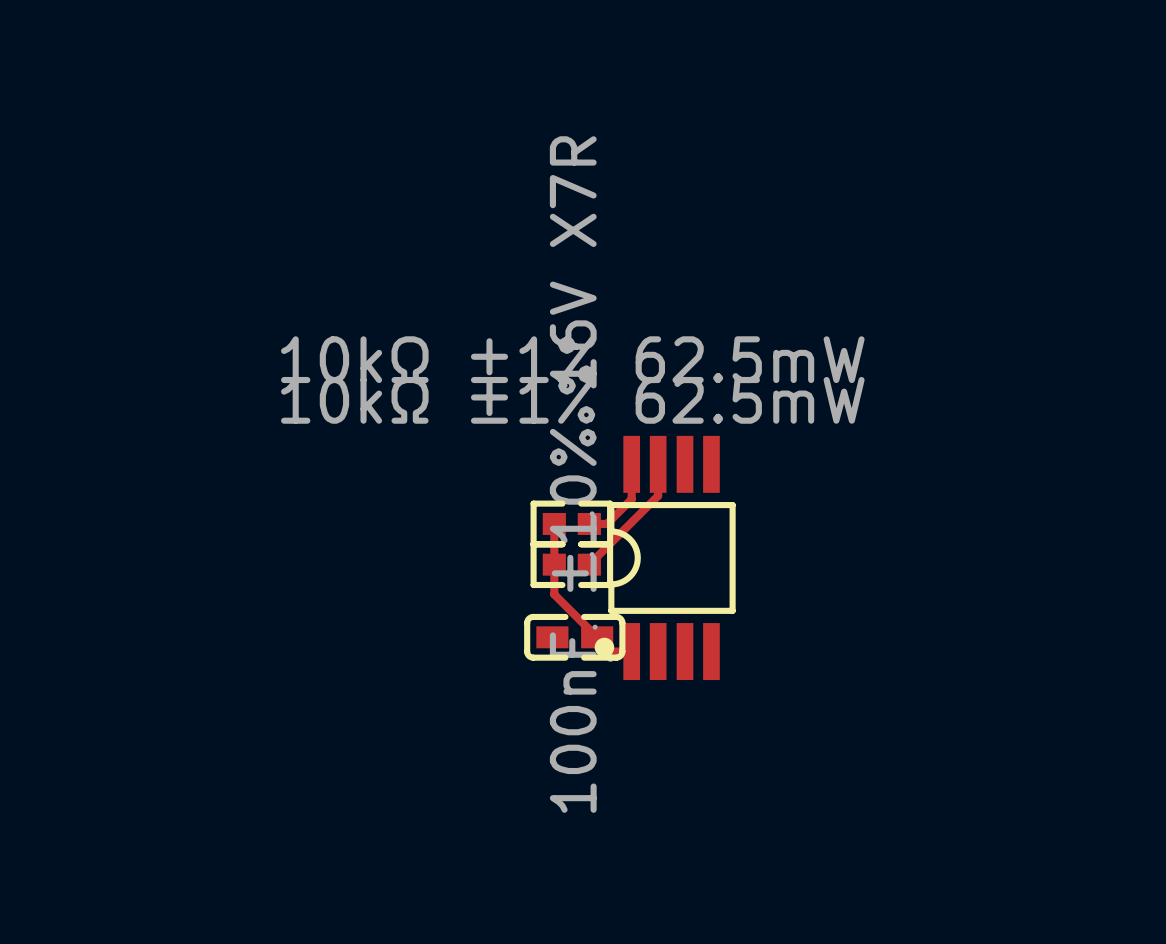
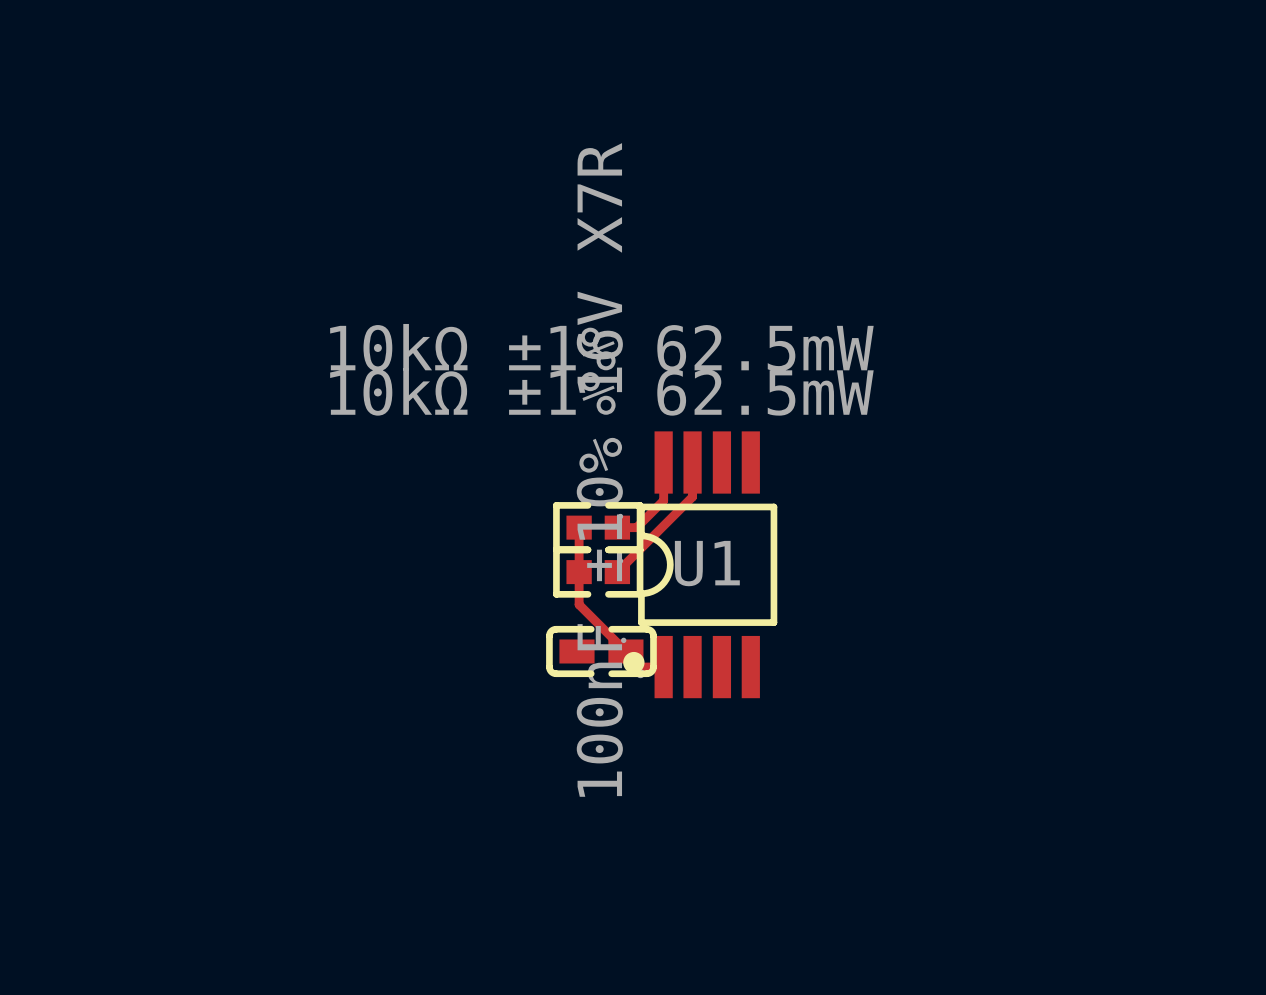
U1 name: none -> U1 (707, 563)

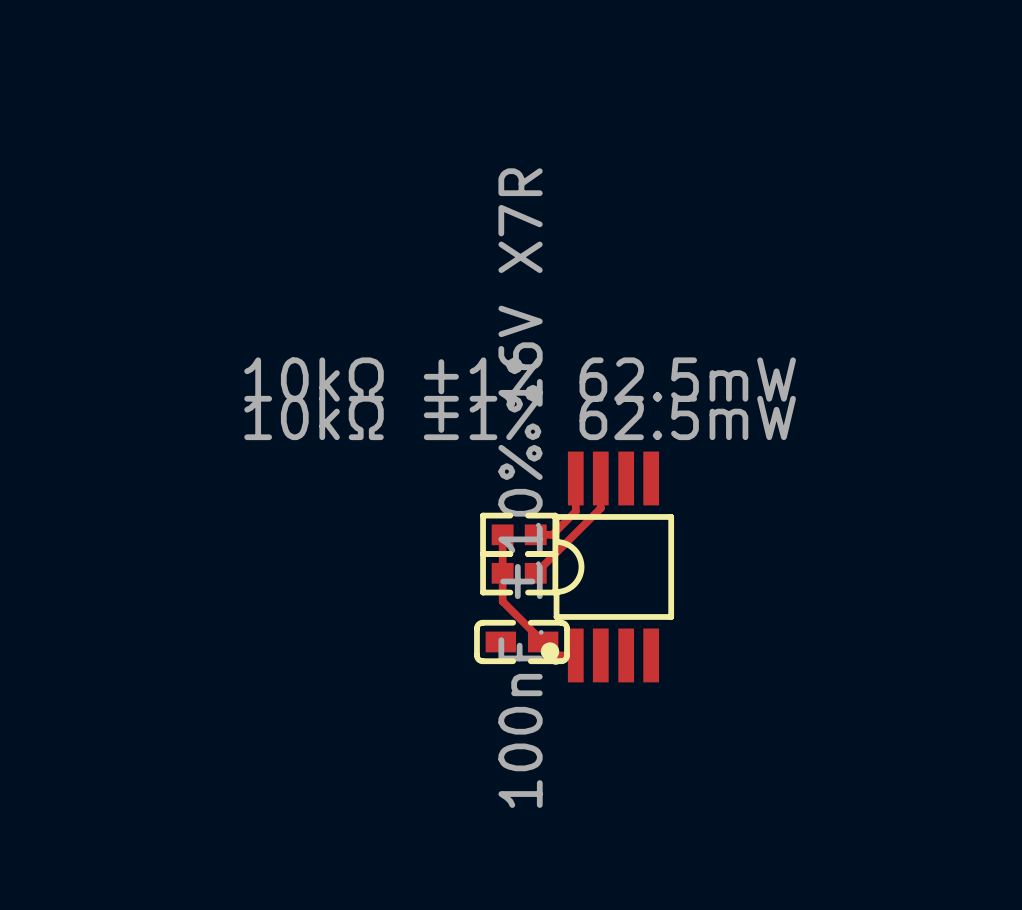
U1 name: U1 (707, 563) -> none

